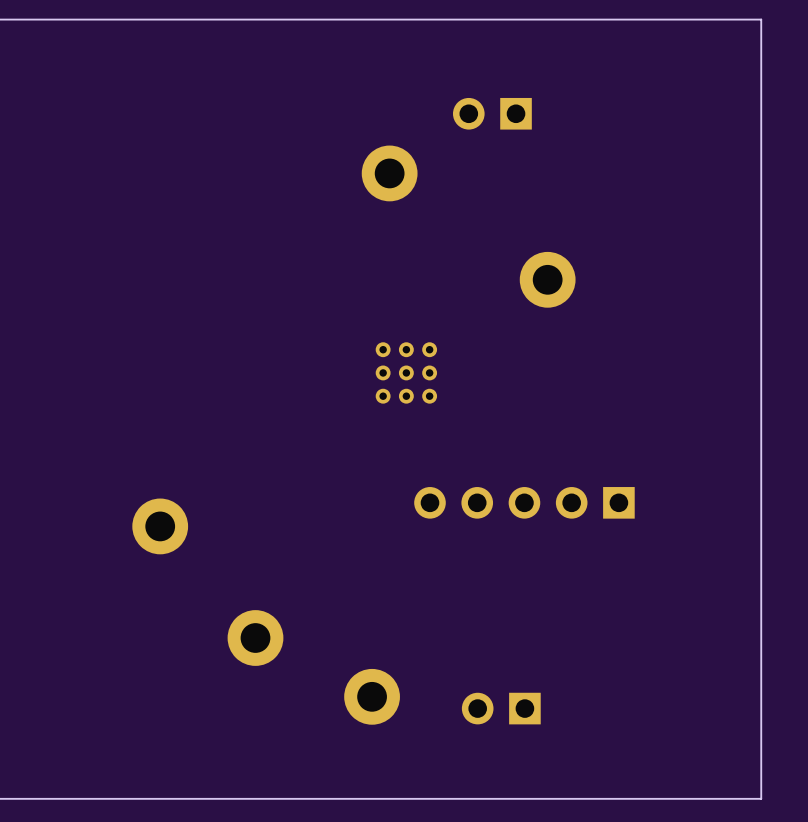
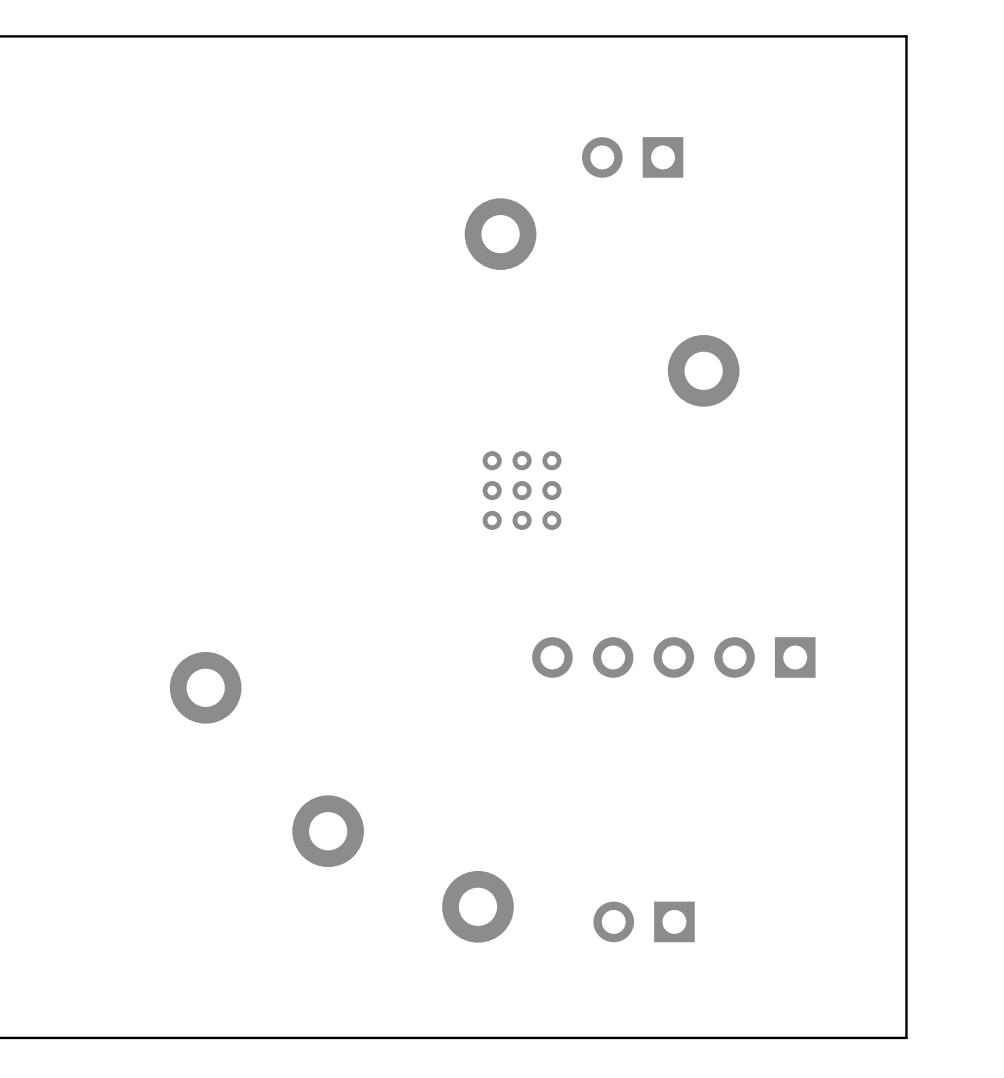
board edge: (705, 19) (761, 19) (761, 798) (705, 798) -> (906, 36) (906, 1037)

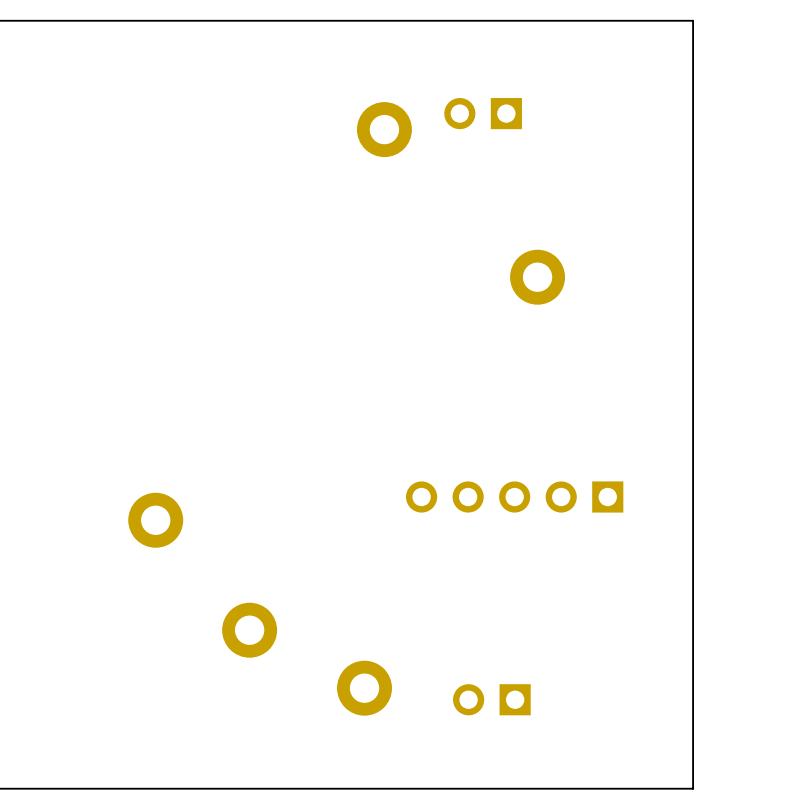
part position: (500, 234) -> (384, 129)
part: (522, 490) -> none

